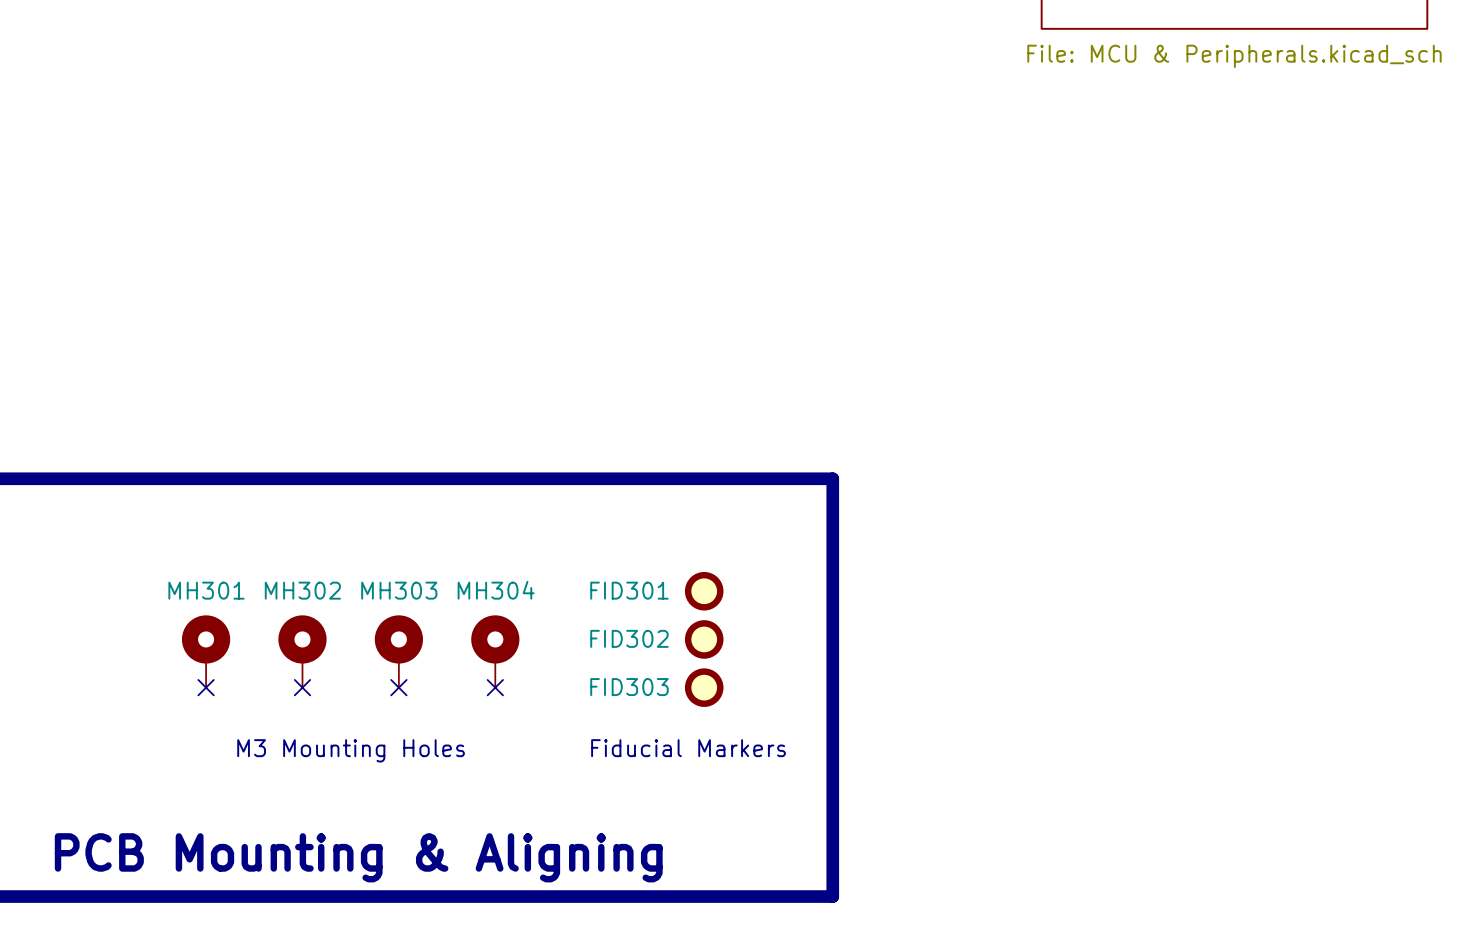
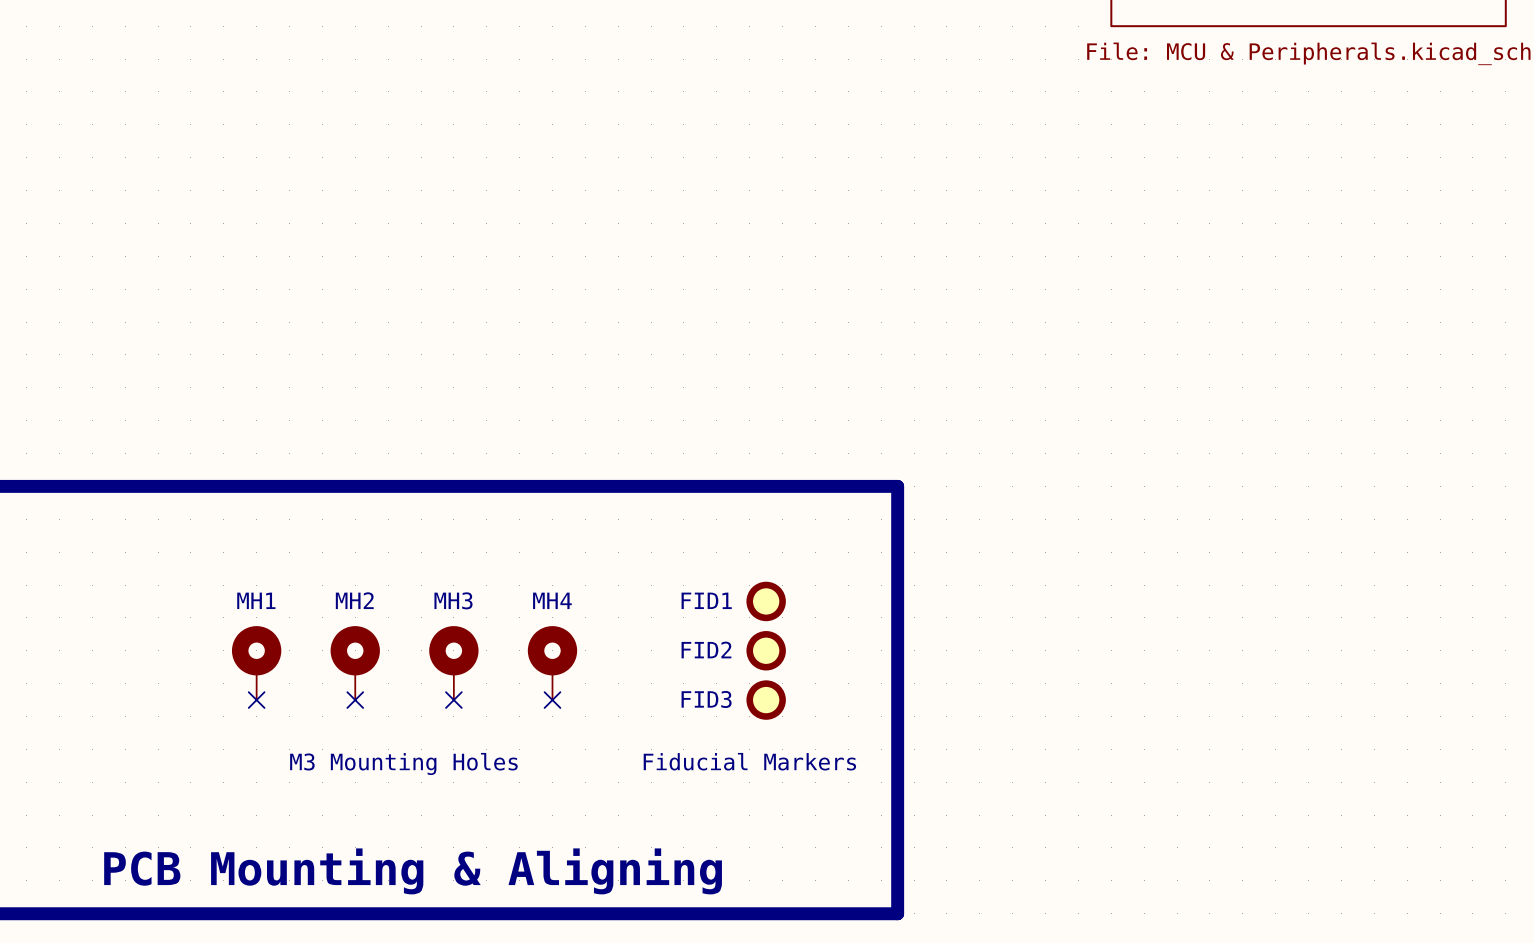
MH301 name: MH301 (206, 590) -> MH1 (256, 600)
MH302 name: MH302 (302, 590) -> MH2 (354, 600)
MH303 name: MH303 (399, 590) -> MH3 (453, 600)
MH304 name: MH304 (496, 590) -> MH4 (552, 600)
FID301 name: FID301 (629, 590) -> FID1 (706, 600)
FID302 name: FID302 (629, 638) -> FID2 (706, 649)
FID303 name: FID303 (629, 687) -> FID3 (706, 699)

